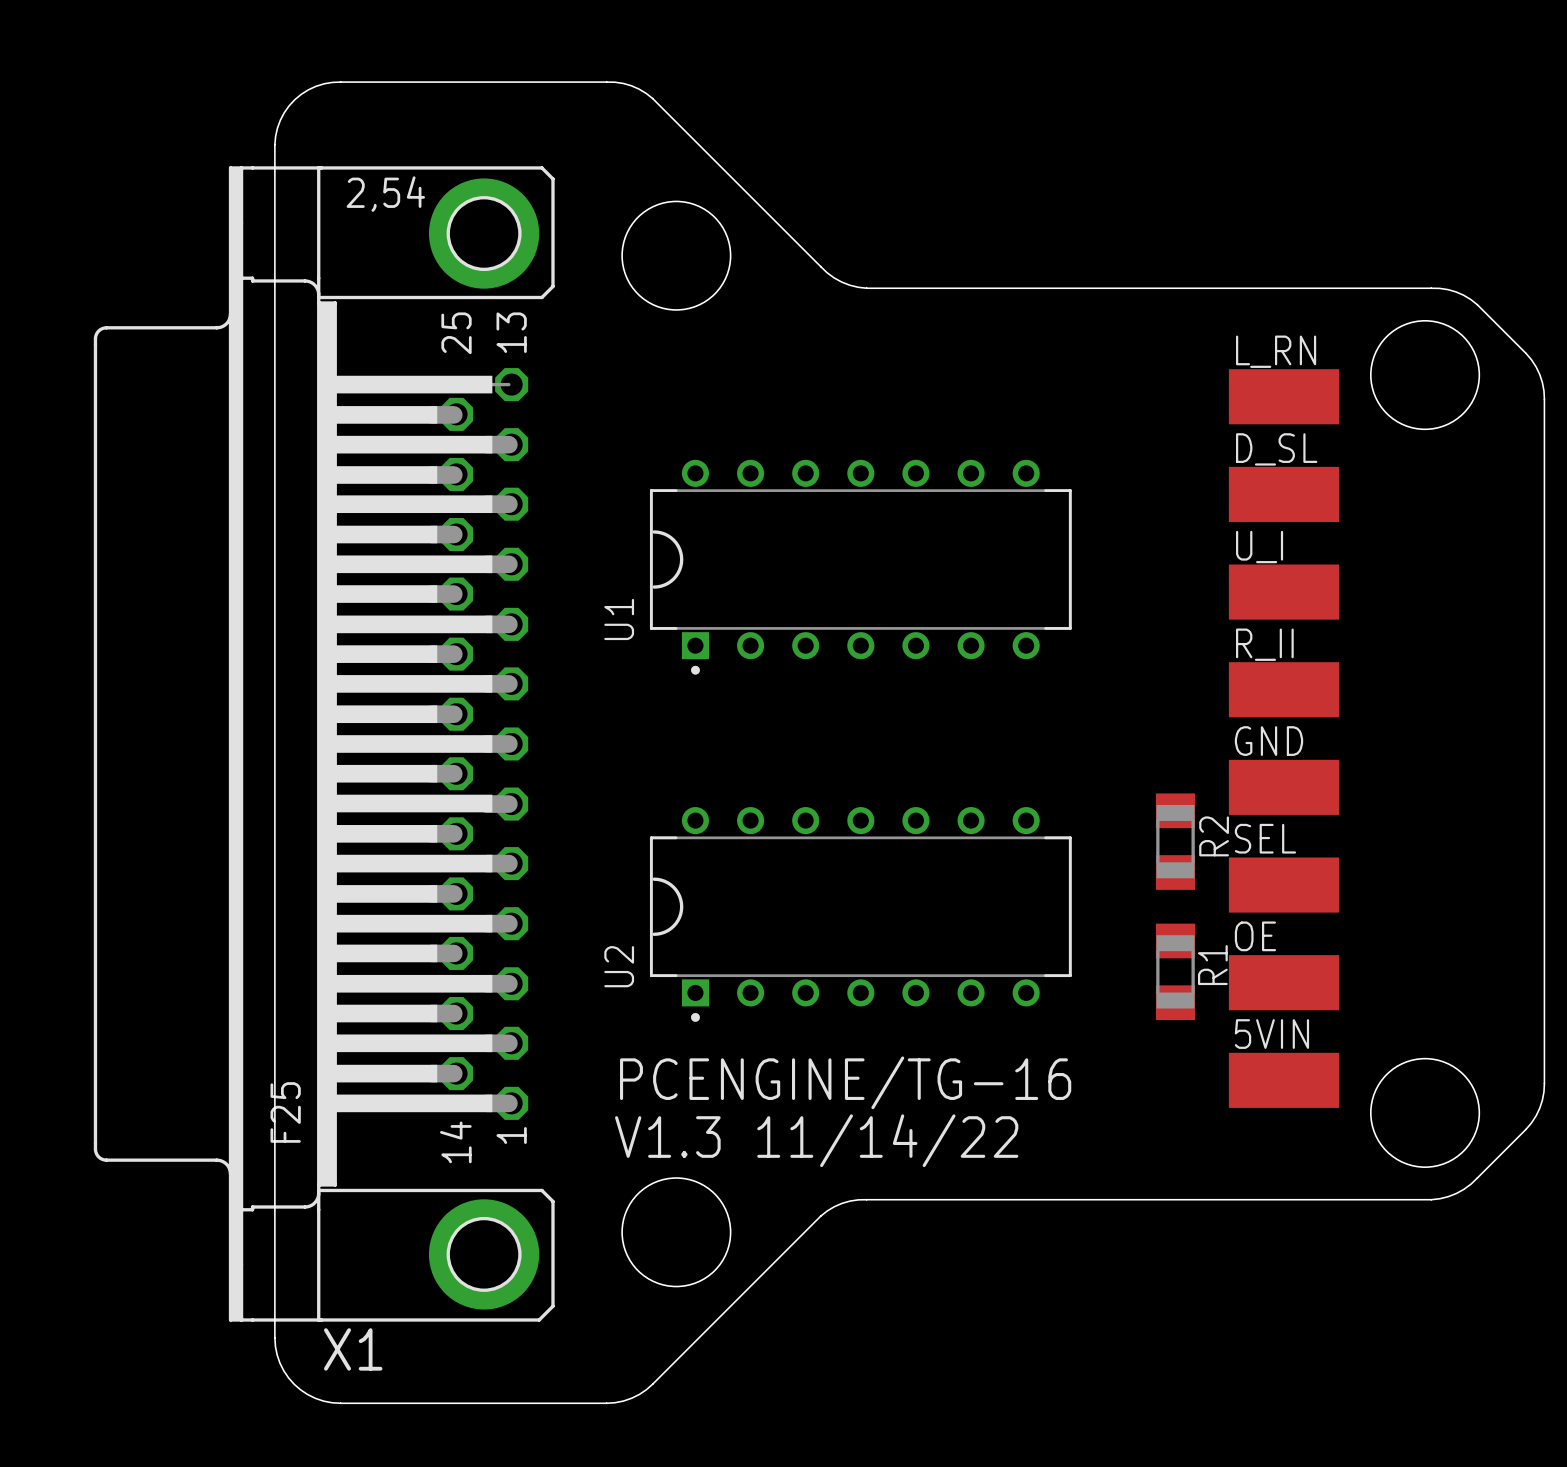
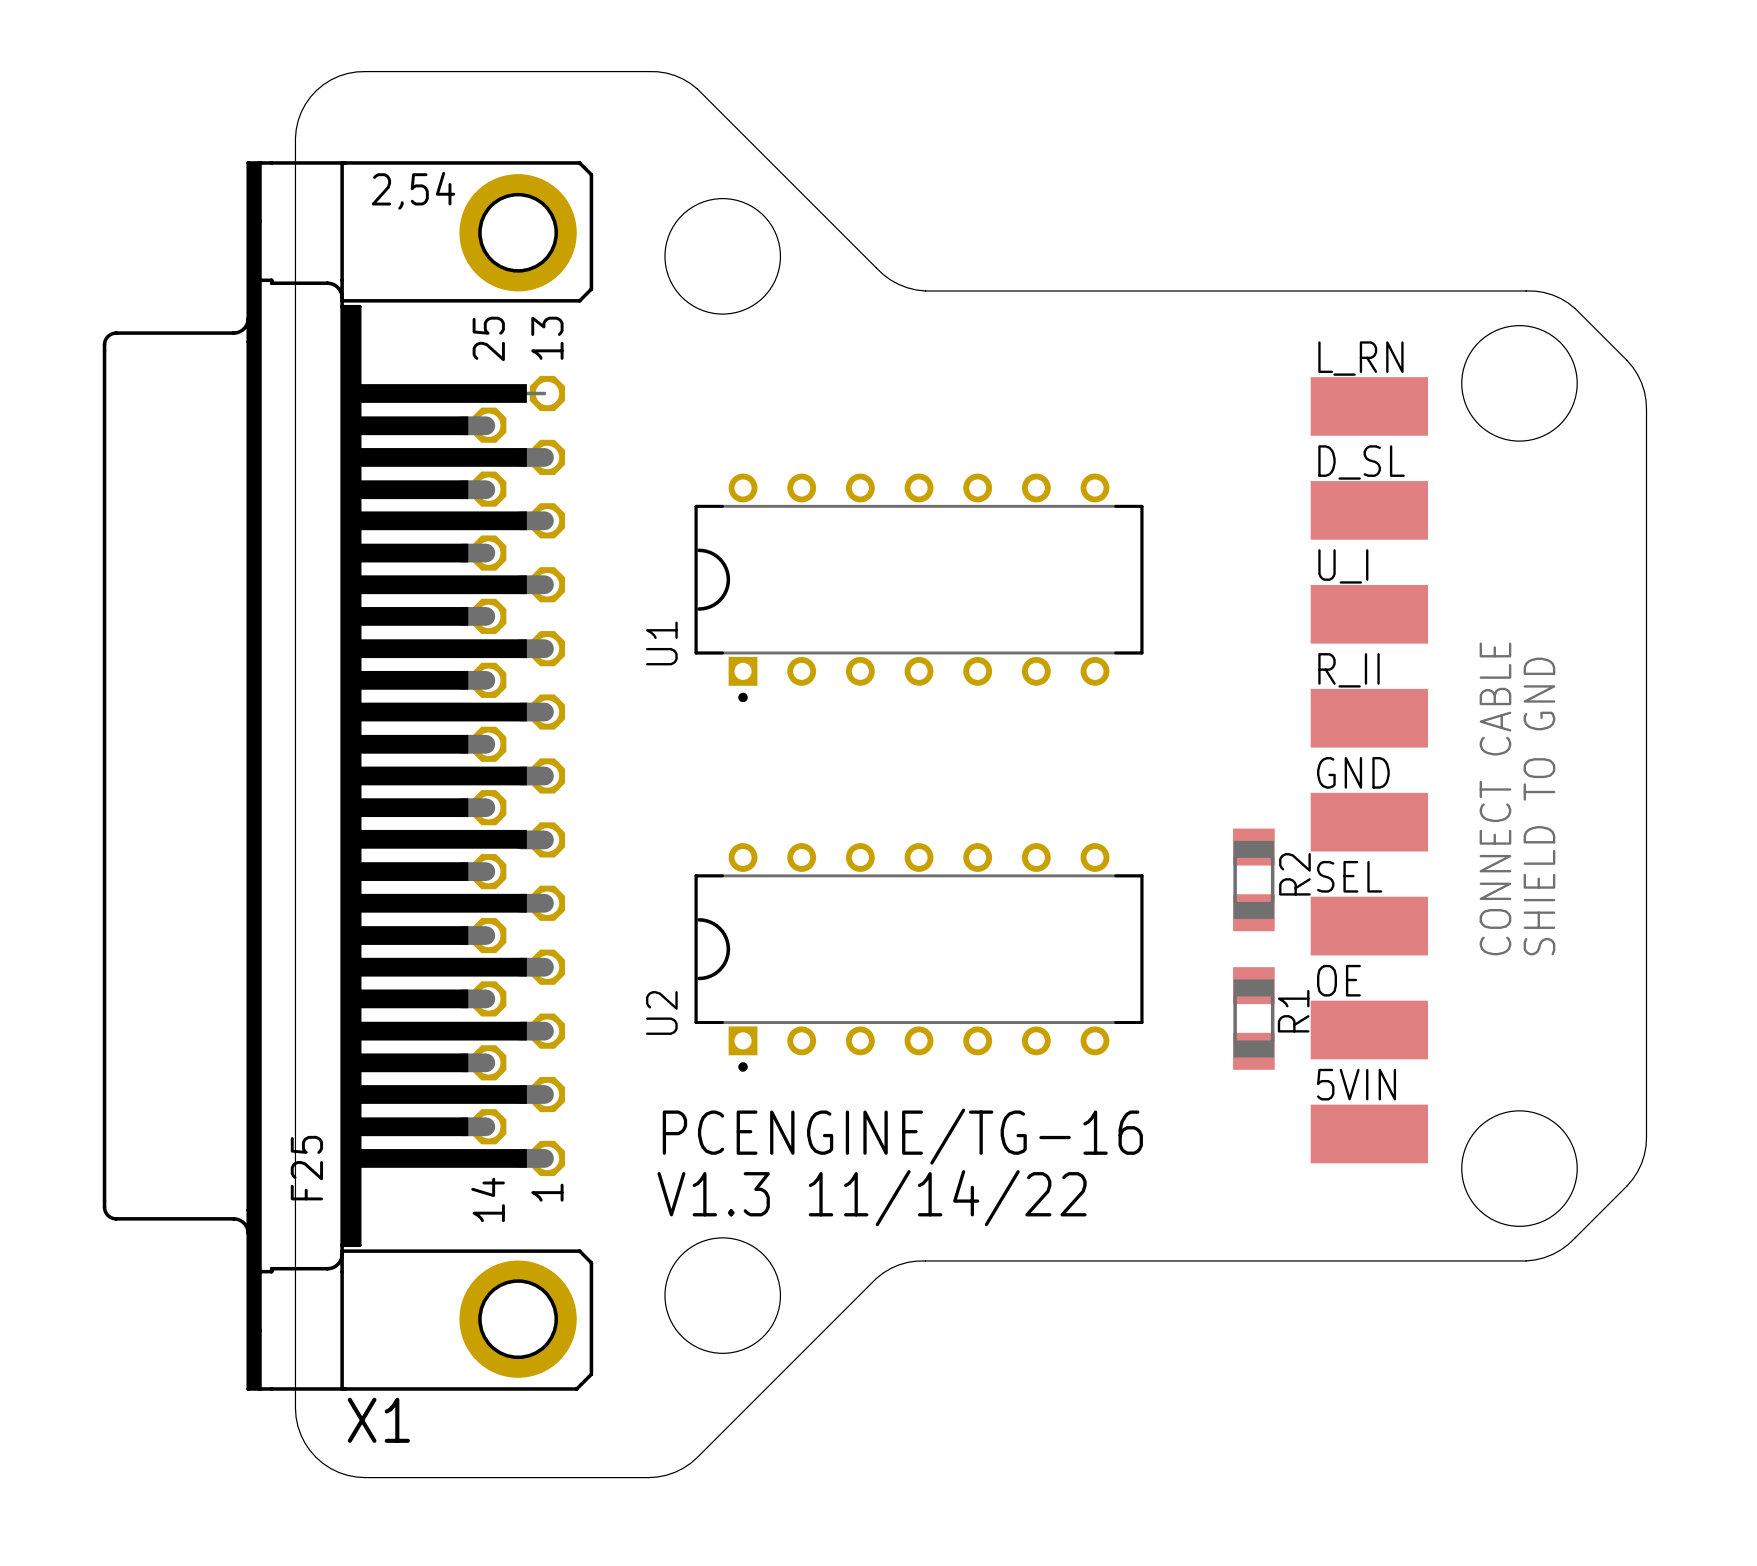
text: none -> CONNECT CABLE (1495, 798)
text: none -> SHIELD TO GND (1539, 806)

